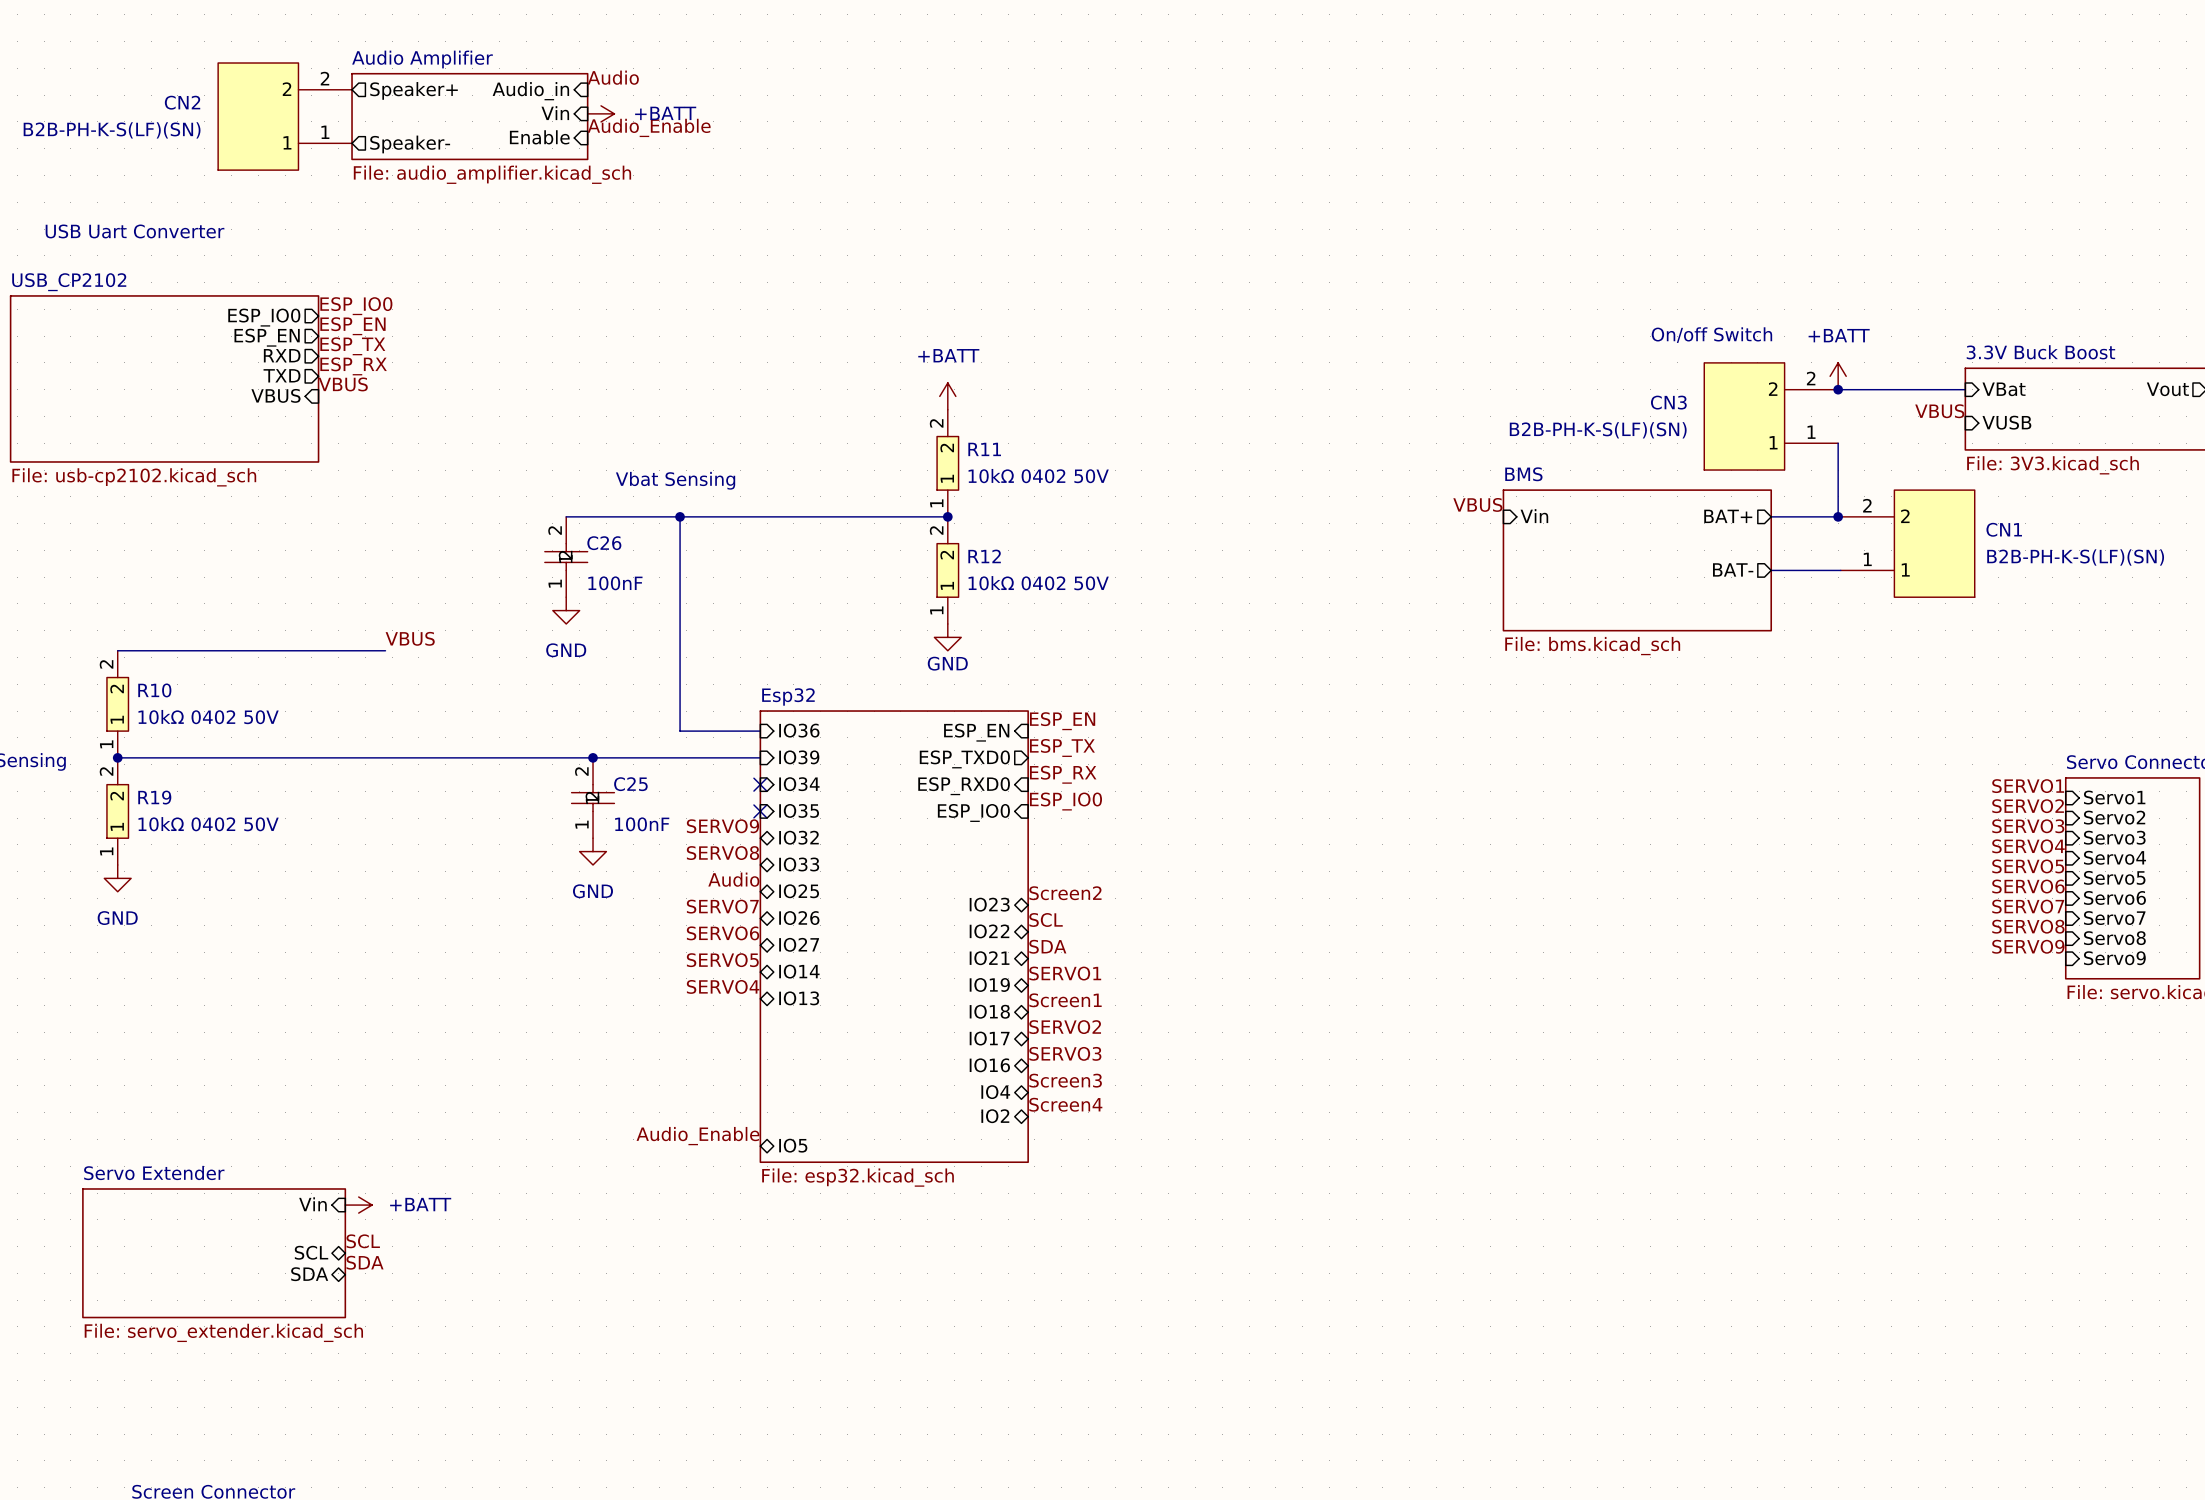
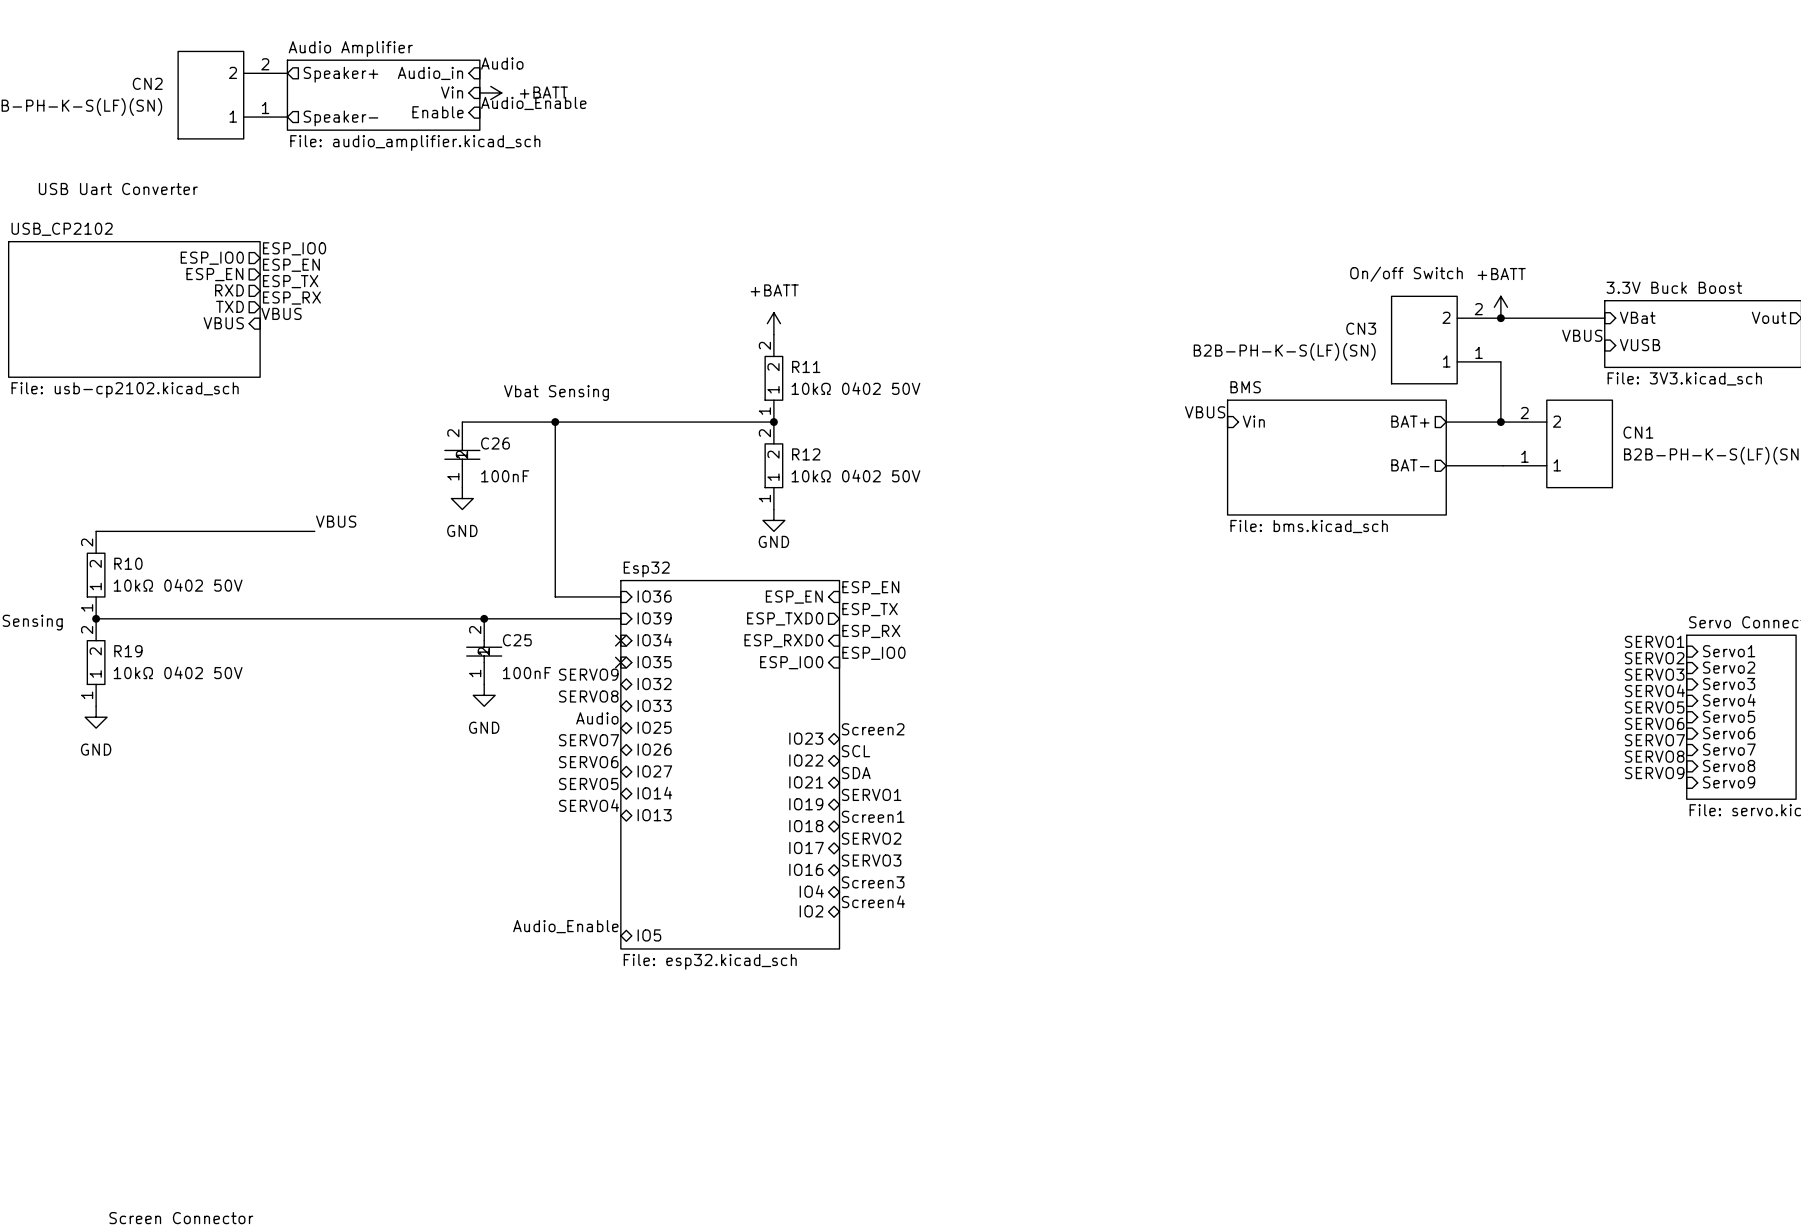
sheet pin: Vin (312, 1204) -> none
power symbol: +BATT (358, 1205) -> none
label: SCL (363, 1241) -> none
sheet pin: SCL (311, 1252) -> none
sheet Servo Extender: File: servo_extender.kicad_sch (214, 1253) -> none
label: SDA (365, 1262) -> none
sheet pin: SDA (309, 1274) -> none

